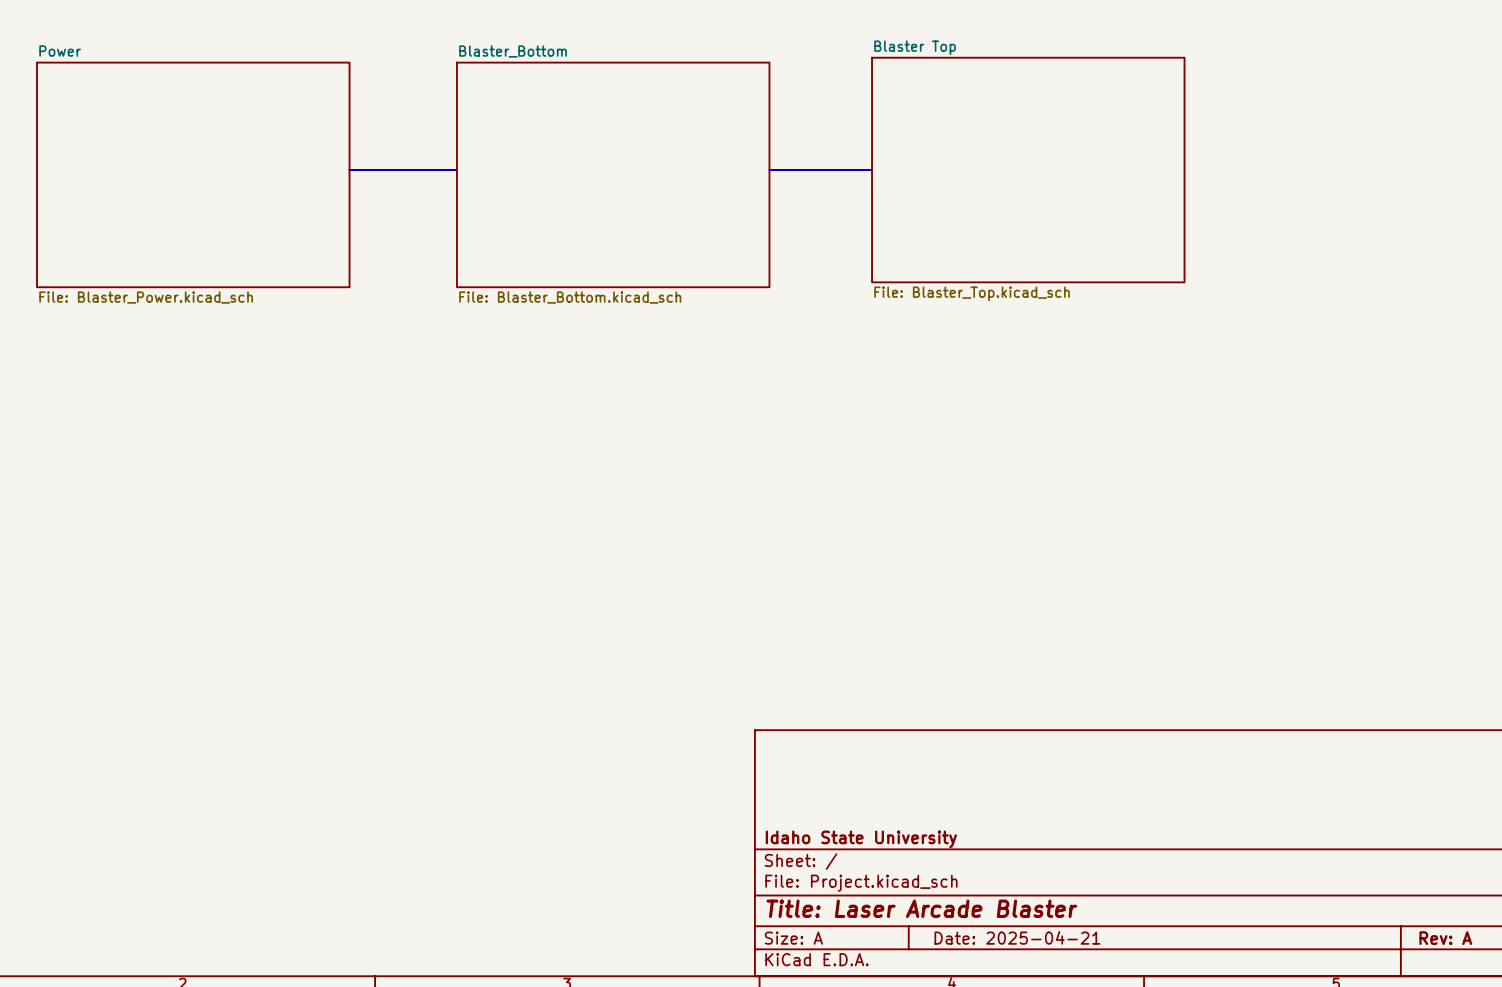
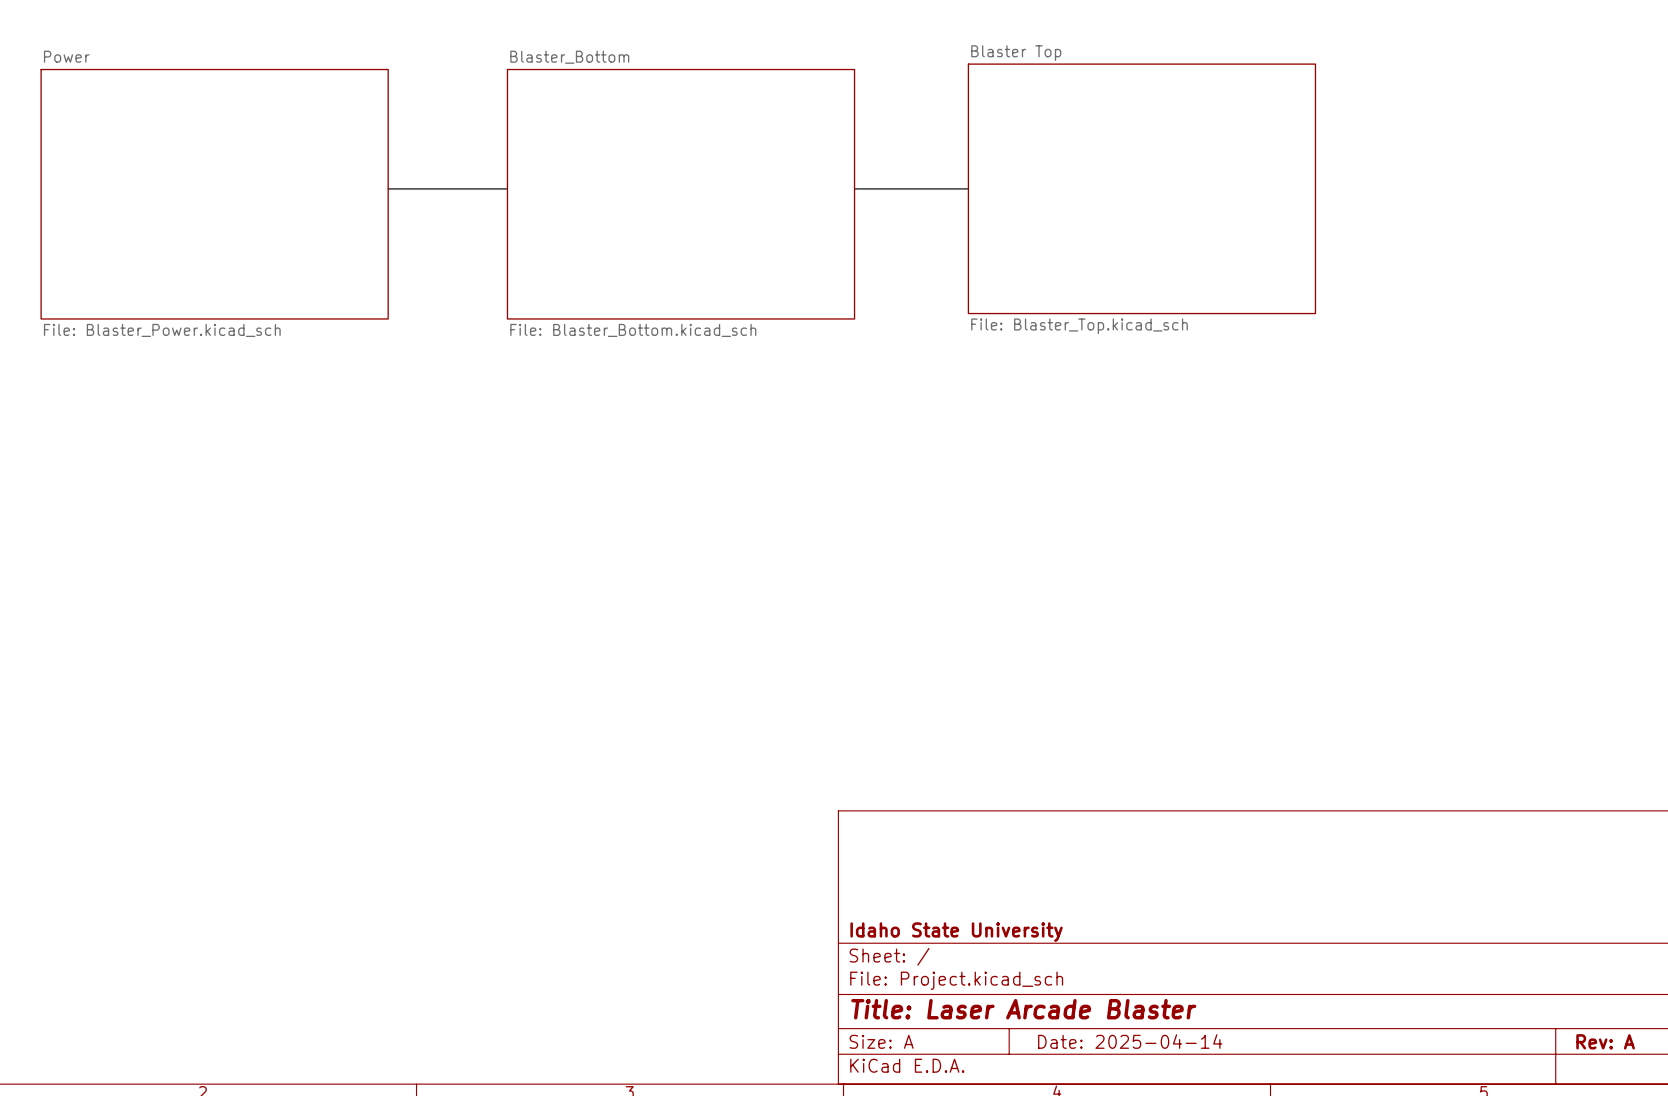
title block: Date: 2025-04-21 (1017, 937) -> Date: 2025-04-14 (1130, 1041)

